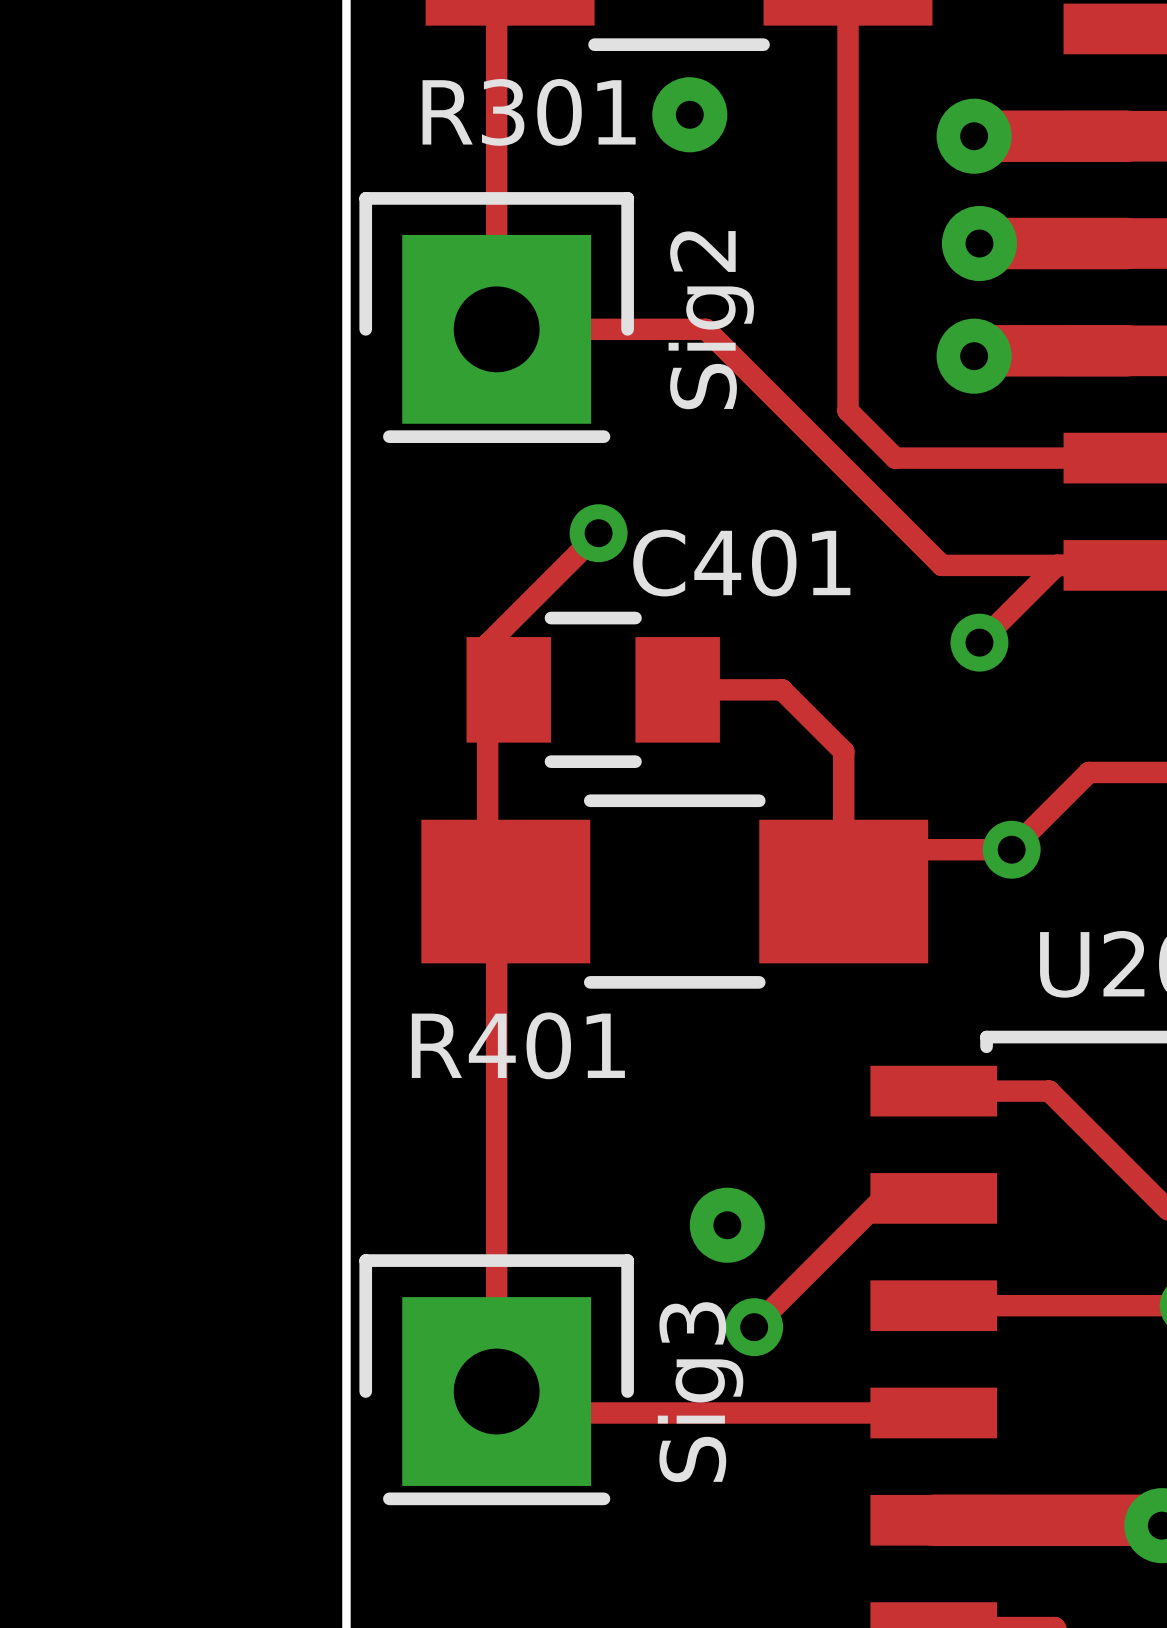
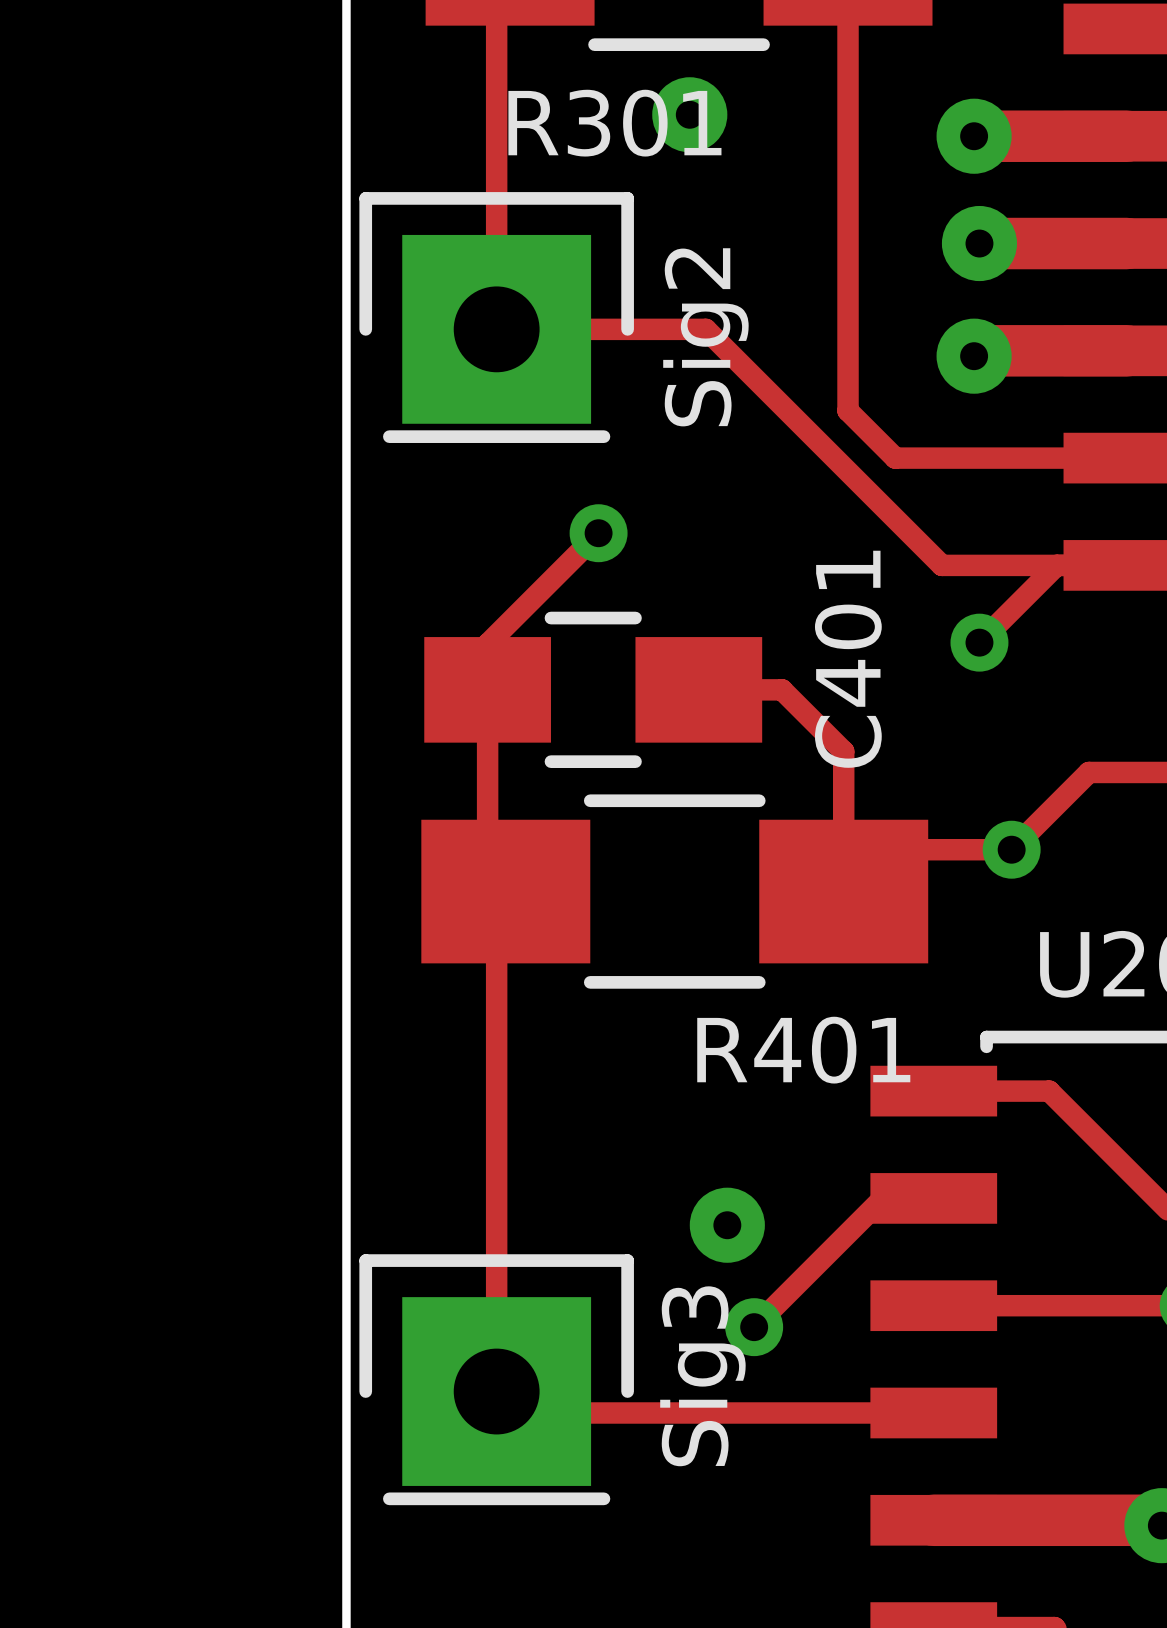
R301 name position: R301 (529, 112) -> R301 (614, 123)
text: Sig2 (711, 320) -> none
part value: none -> Sig2 (705, 337)
C401 name rotation: 0° (741, 563) -> 90° counterclockwise (848, 659)
C401 footprint: [466, 611, 720, 769] -> [424, 611, 763, 769]
R401 name position: R401 (518, 1045) -> R401 (803, 1050)
part value: none -> Sig3 (702, 1376)
text: Sig3 (700, 1392) -> none

